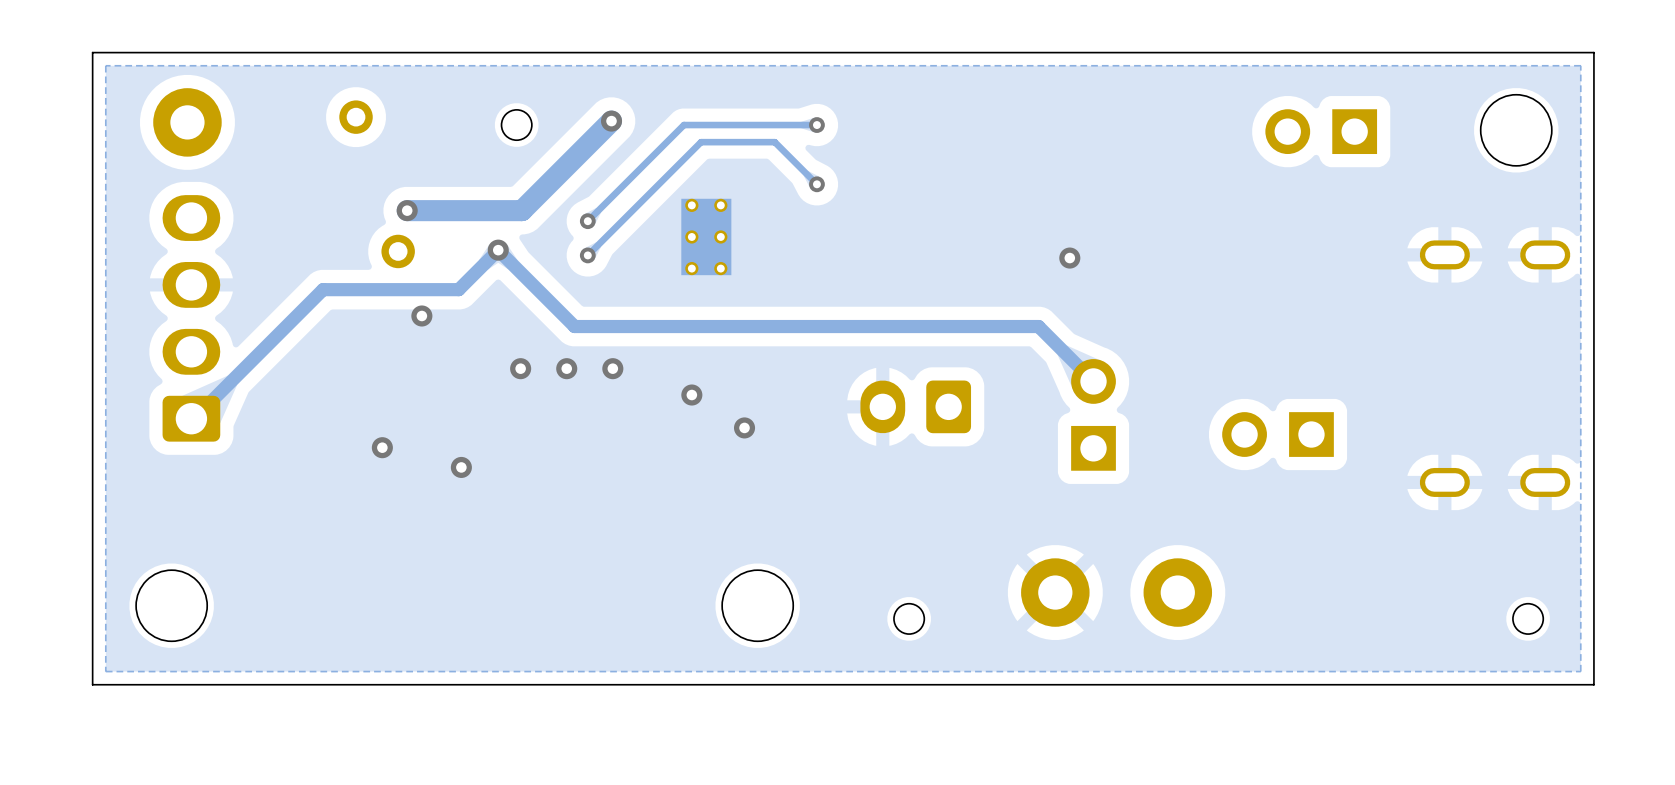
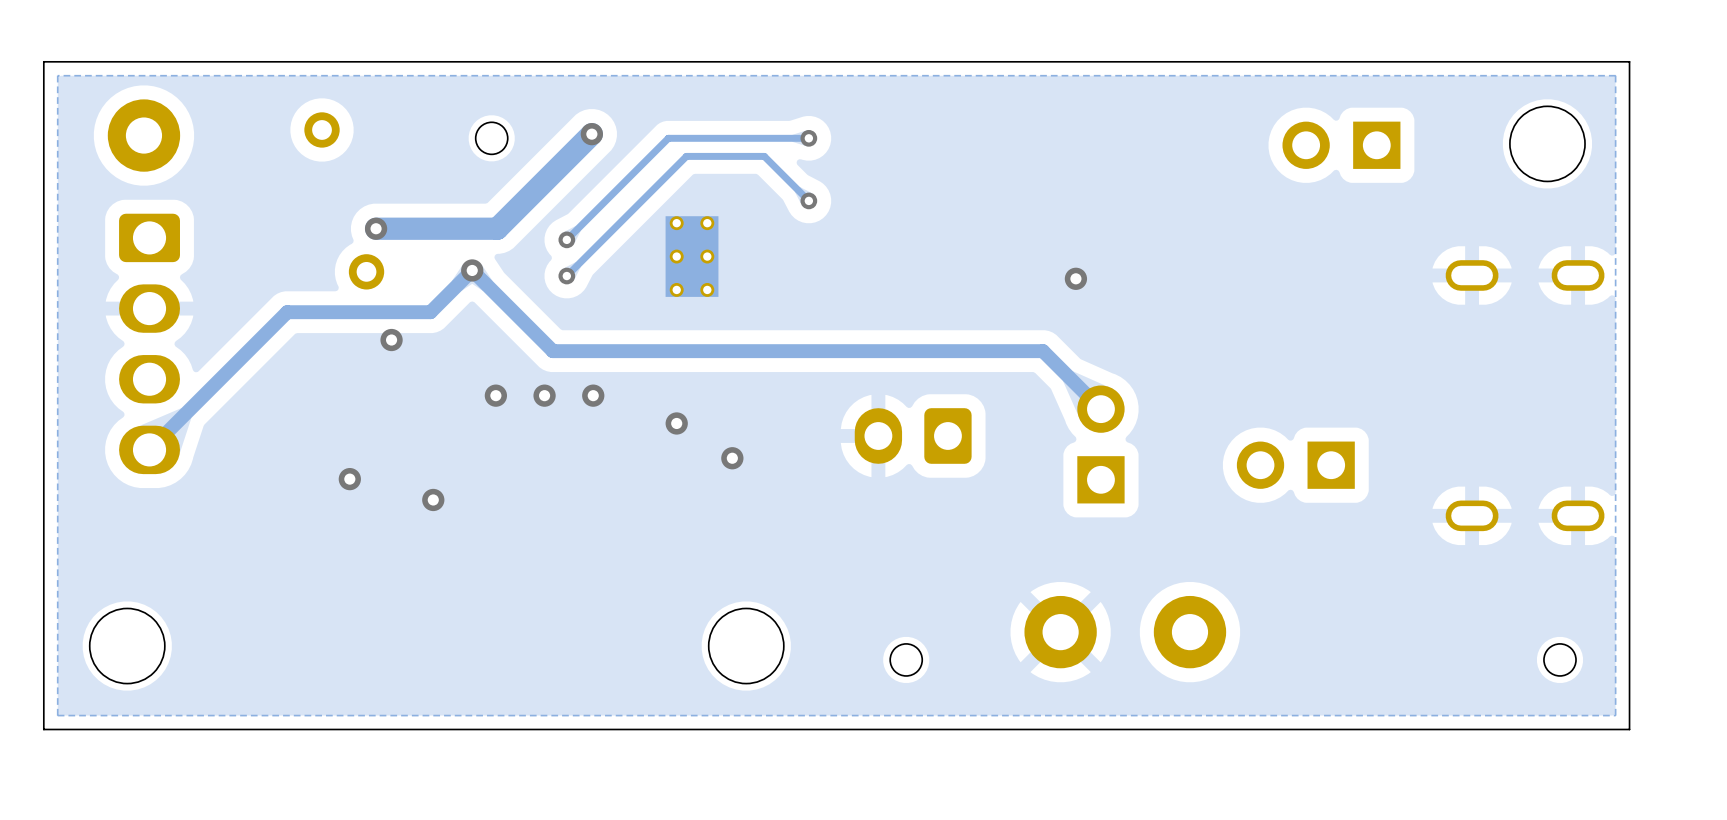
part rotation: 0° (191, 318) -> 180° (149, 343)

